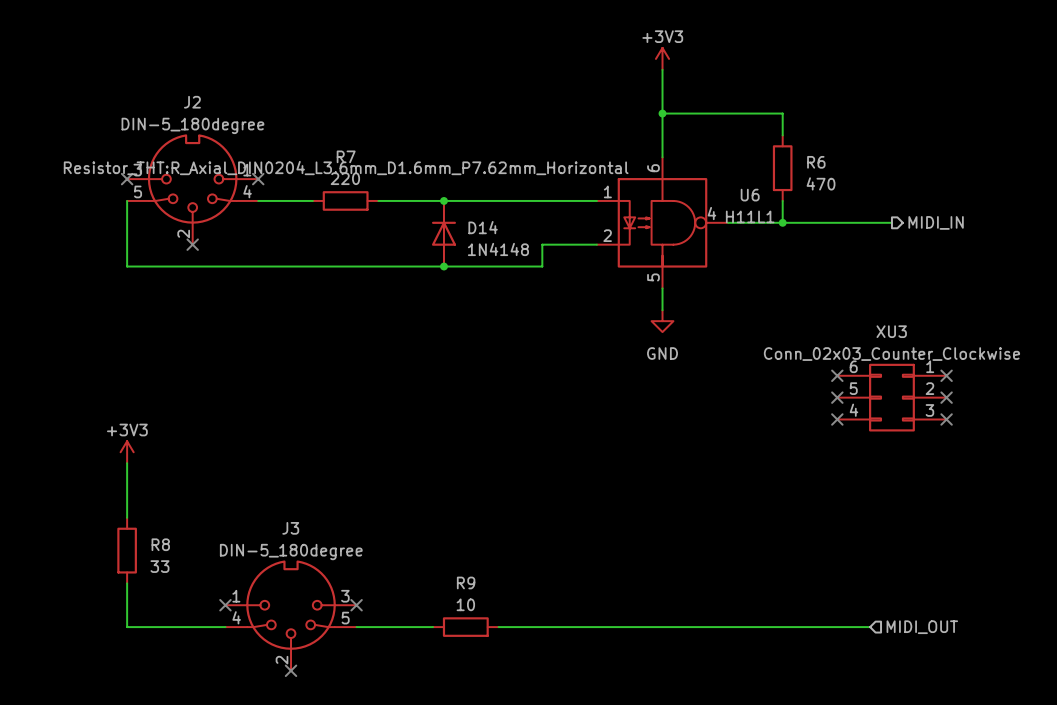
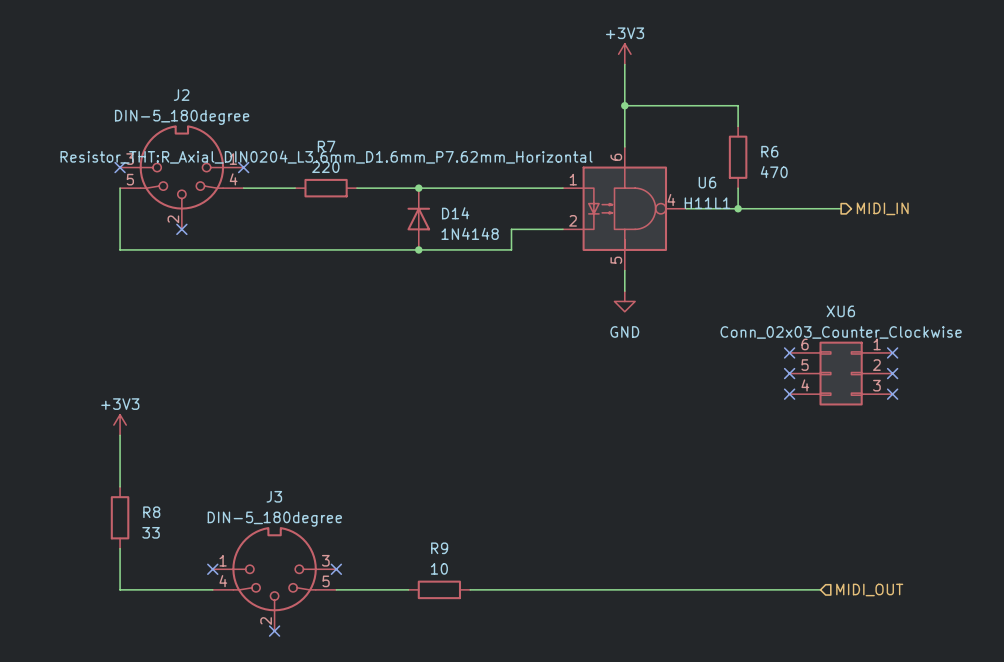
XU3 name: XU3 (891, 331) -> XU6 (840, 311)

